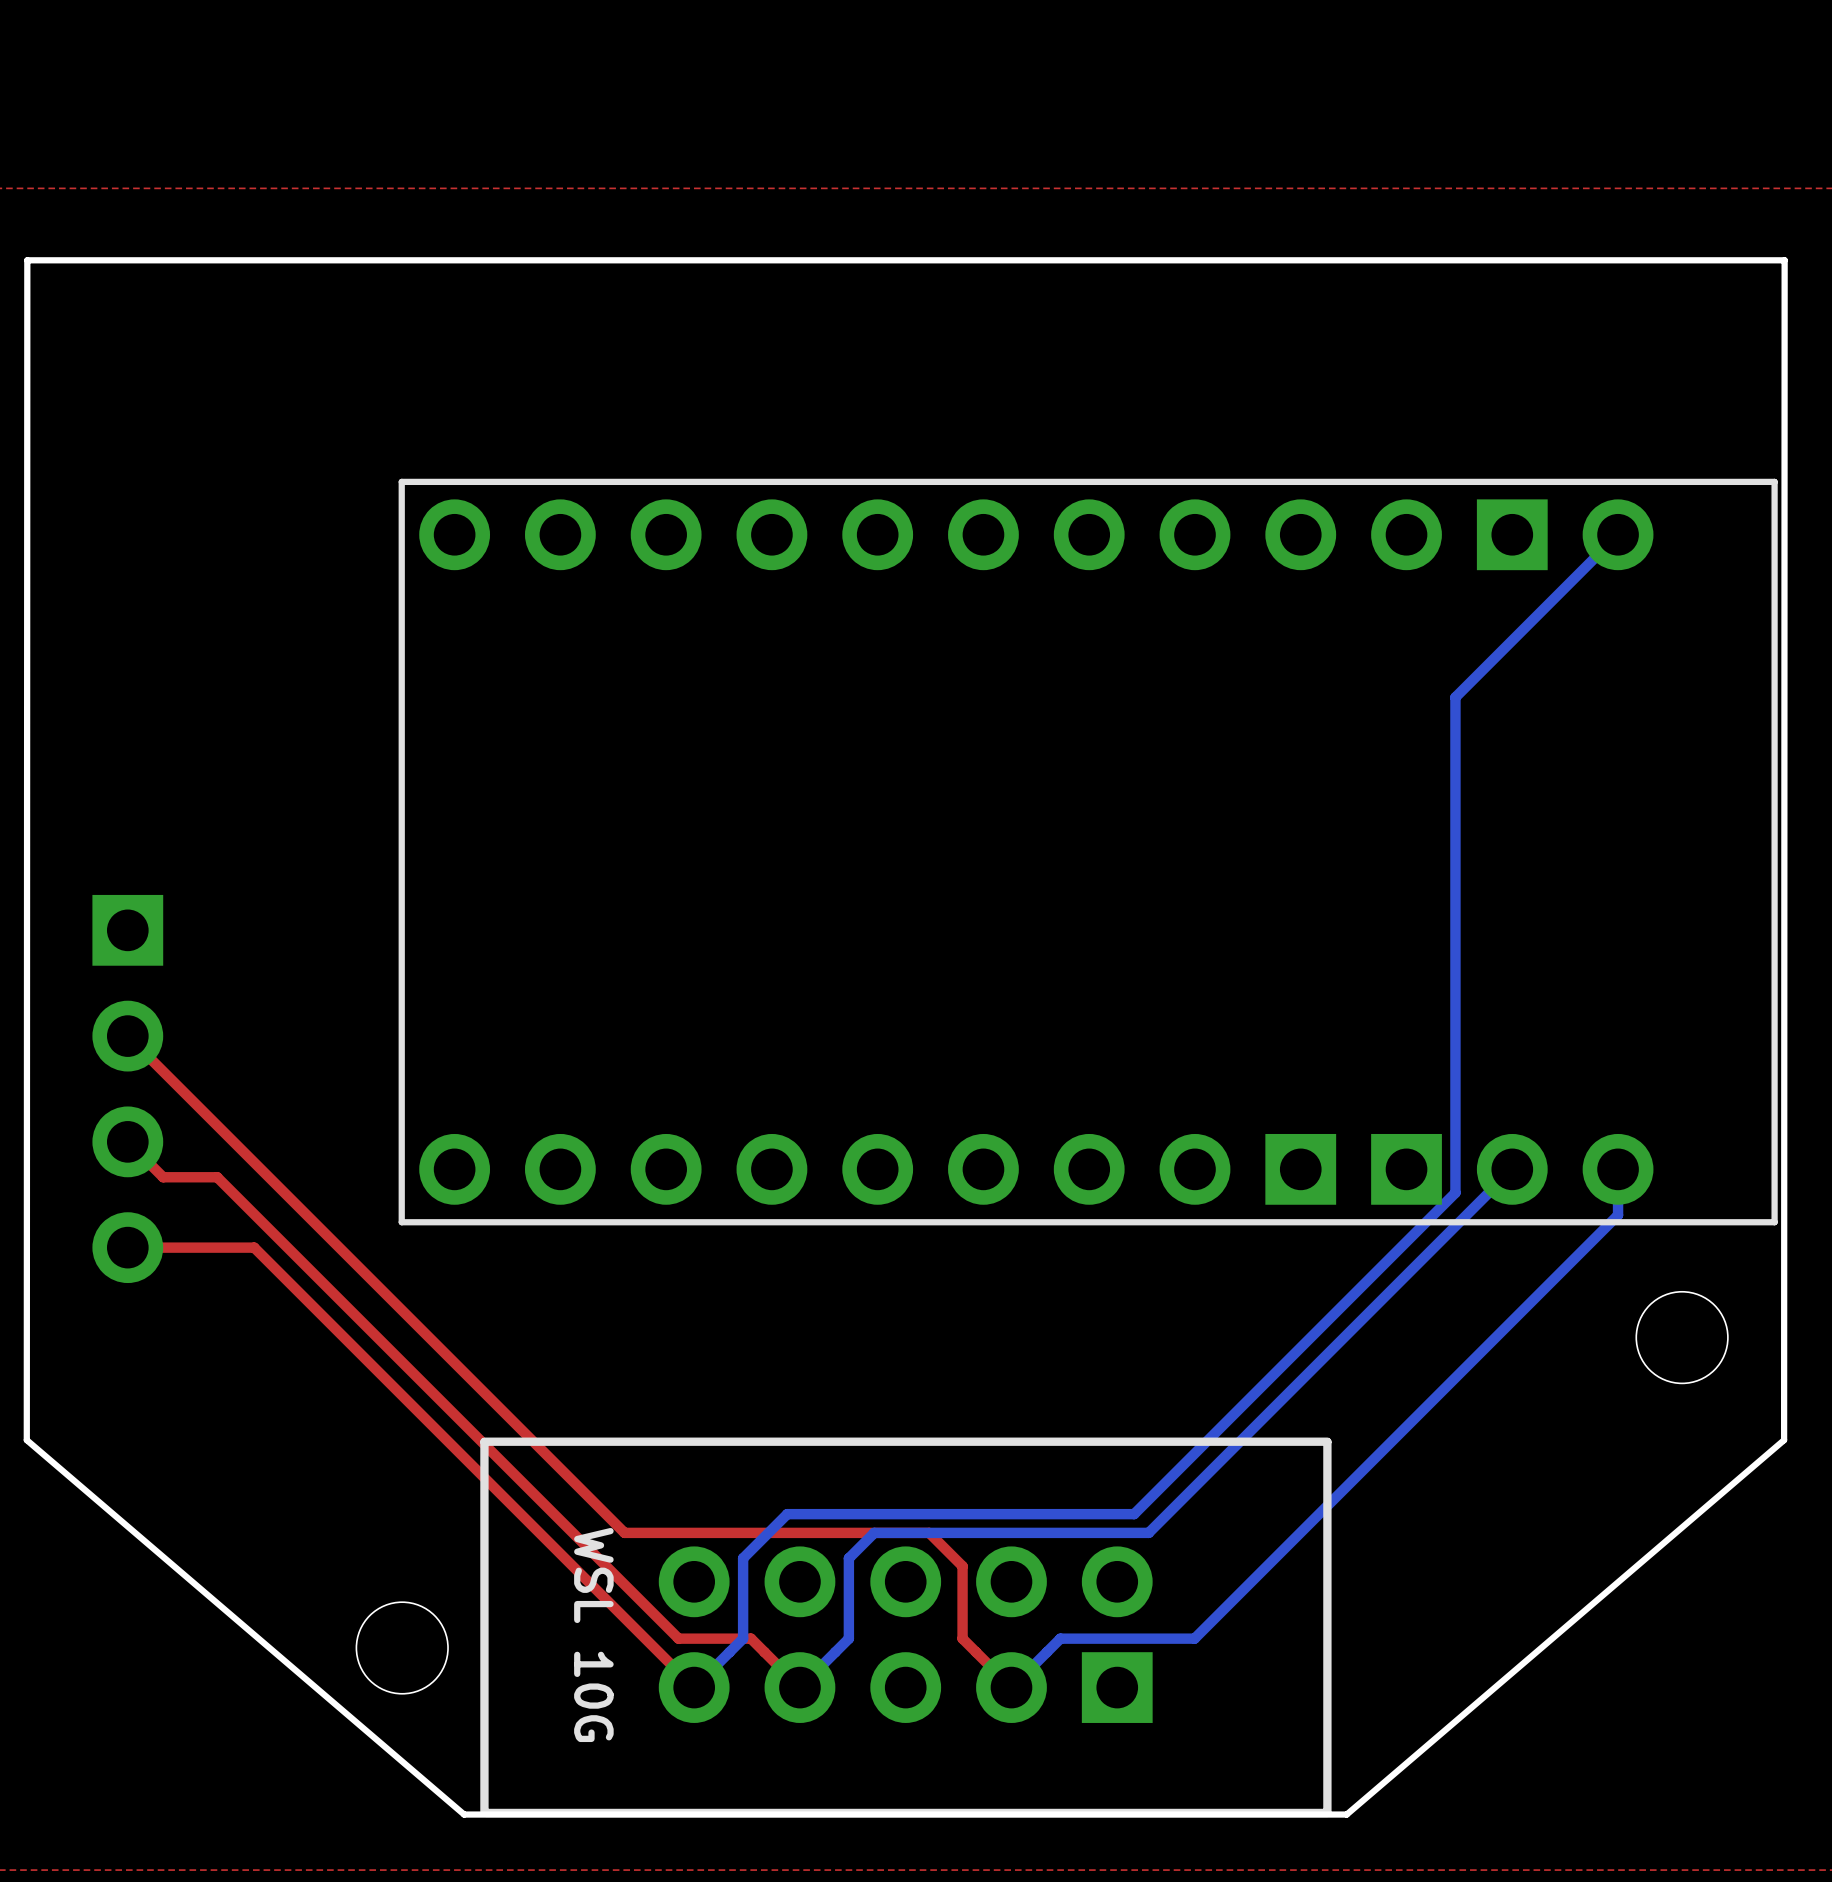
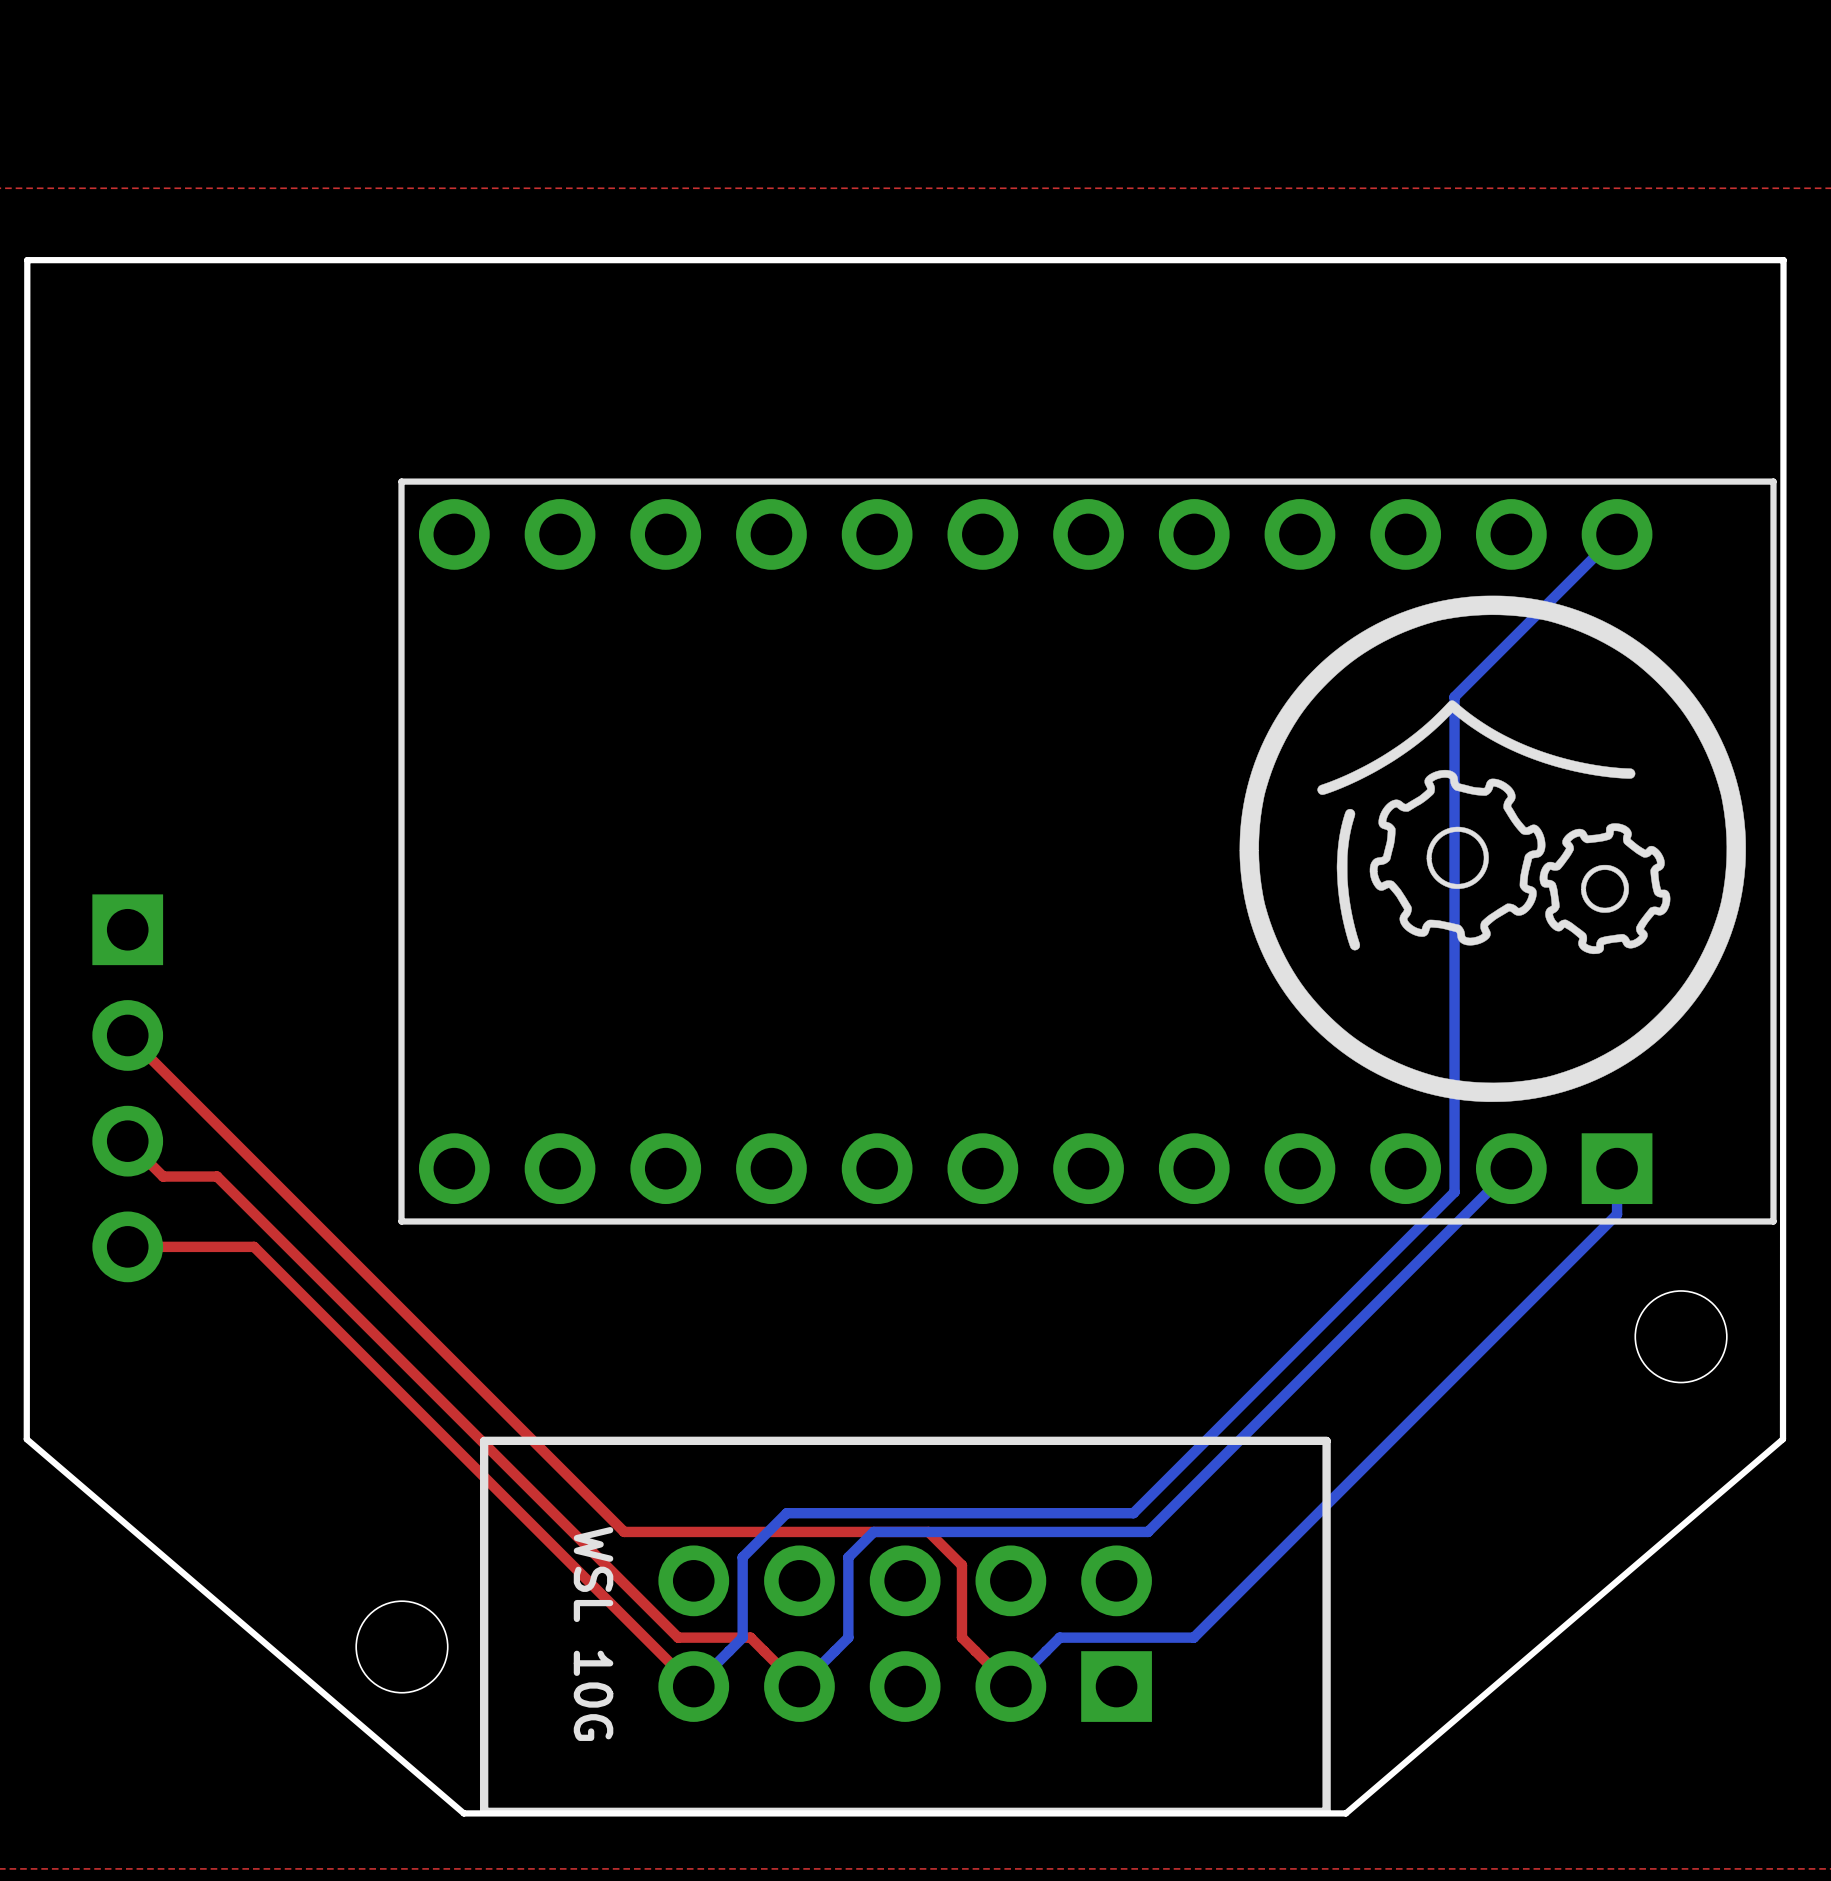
part footprint: [398, 478, 1778, 1226] -> [398, 478, 1777, 1225]
drawing: none -> [1239, 595, 1746, 1102]

